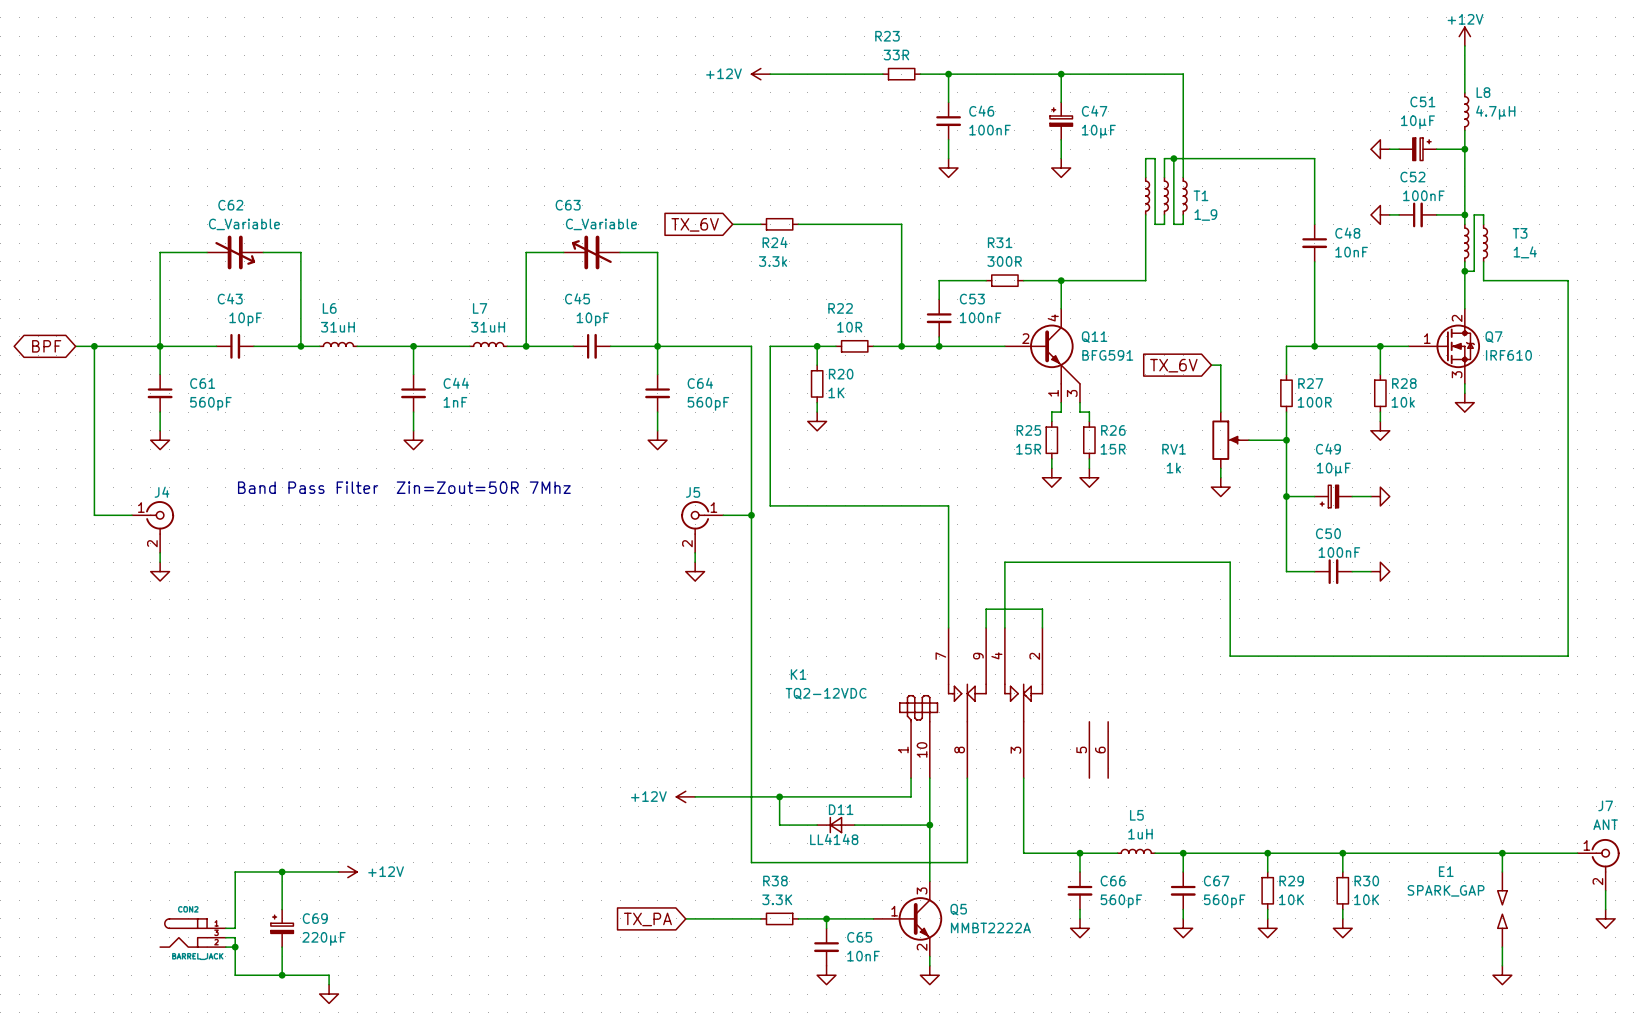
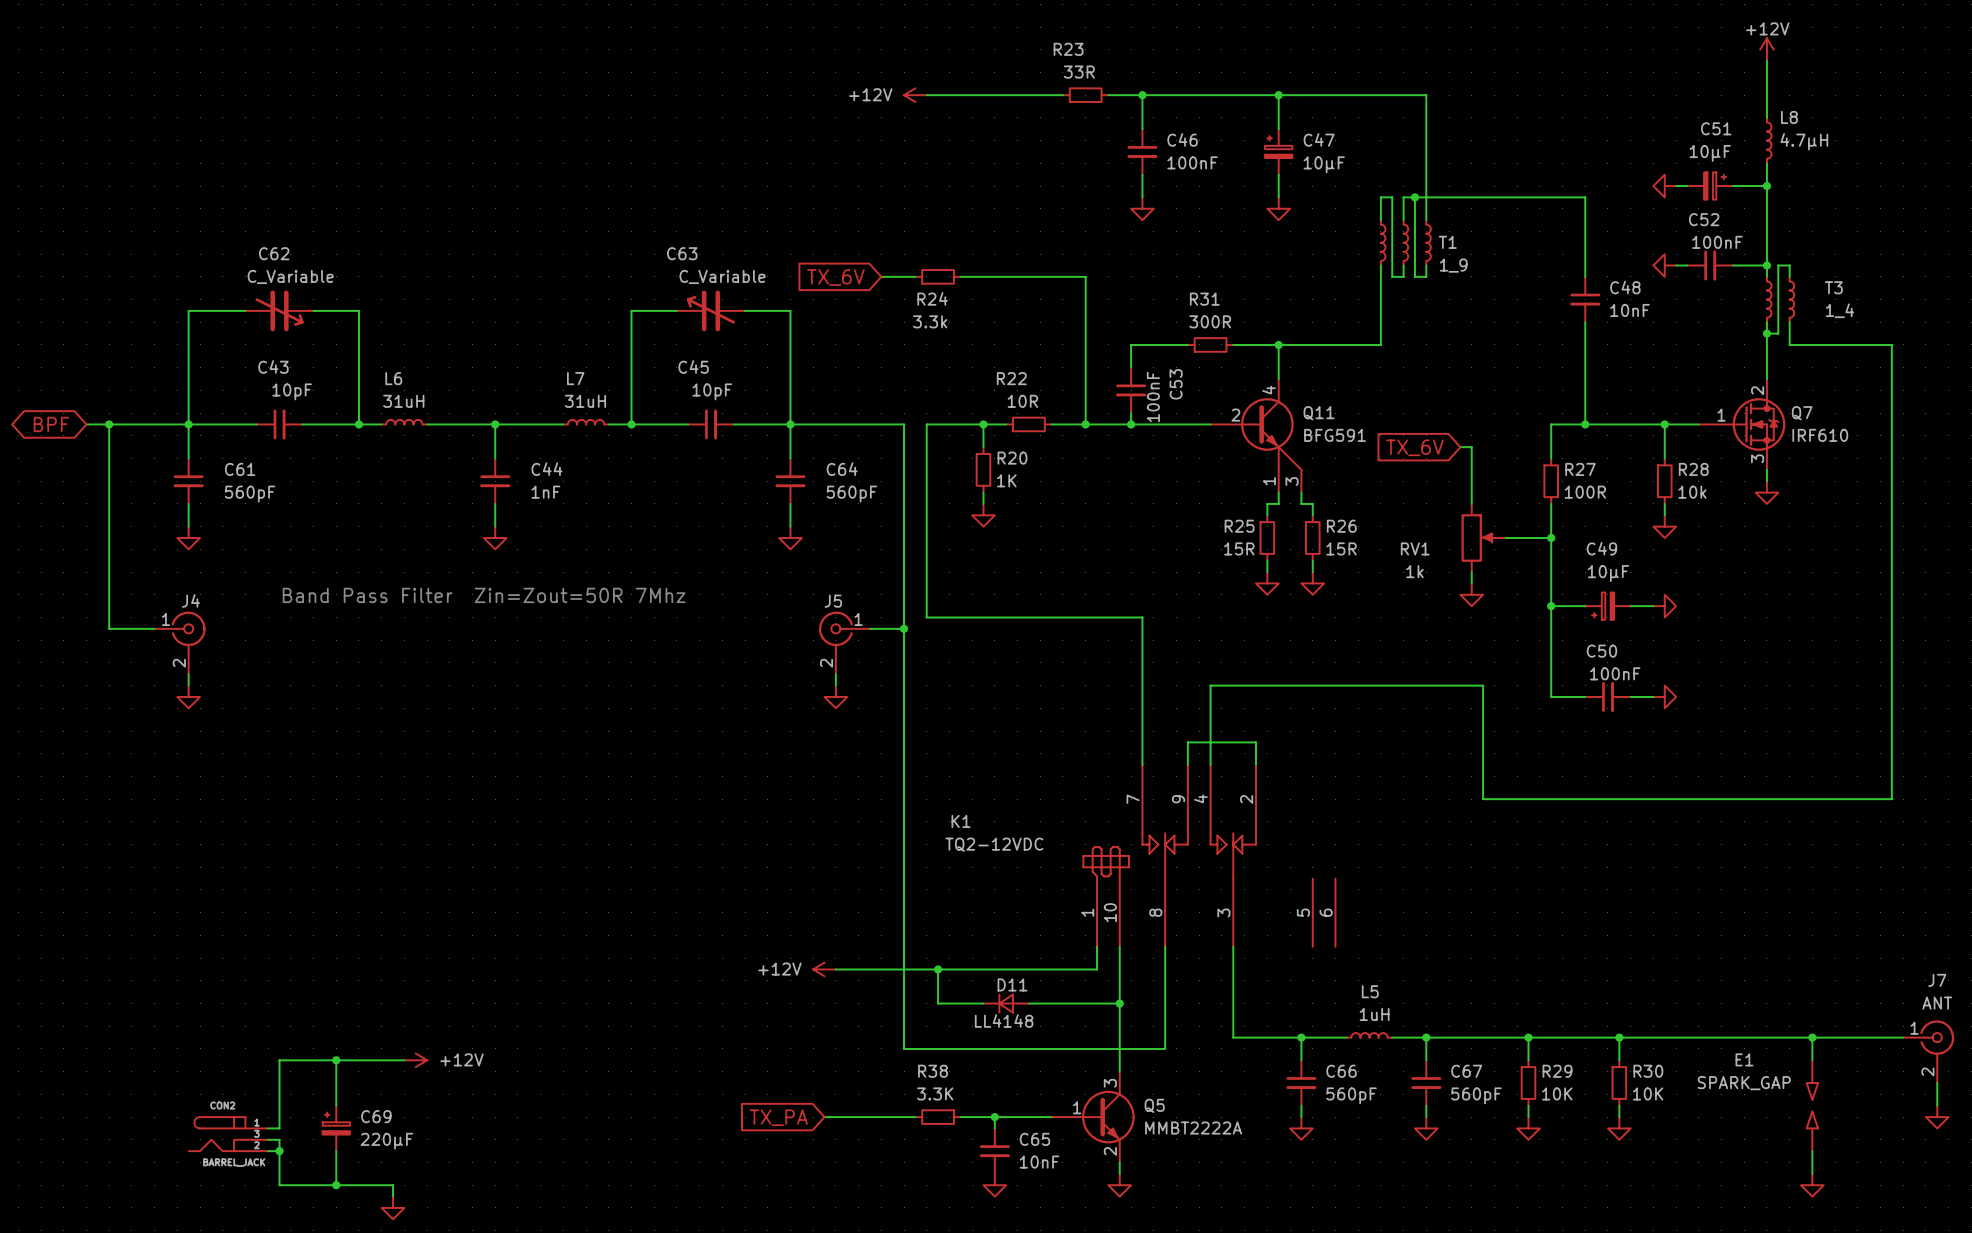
C53 name rotation: 0° (972, 299) -> 90° counterclockwise (1176, 384)
C53 value rotation: 0° (980, 317) -> 90° counterclockwise (1153, 397)

